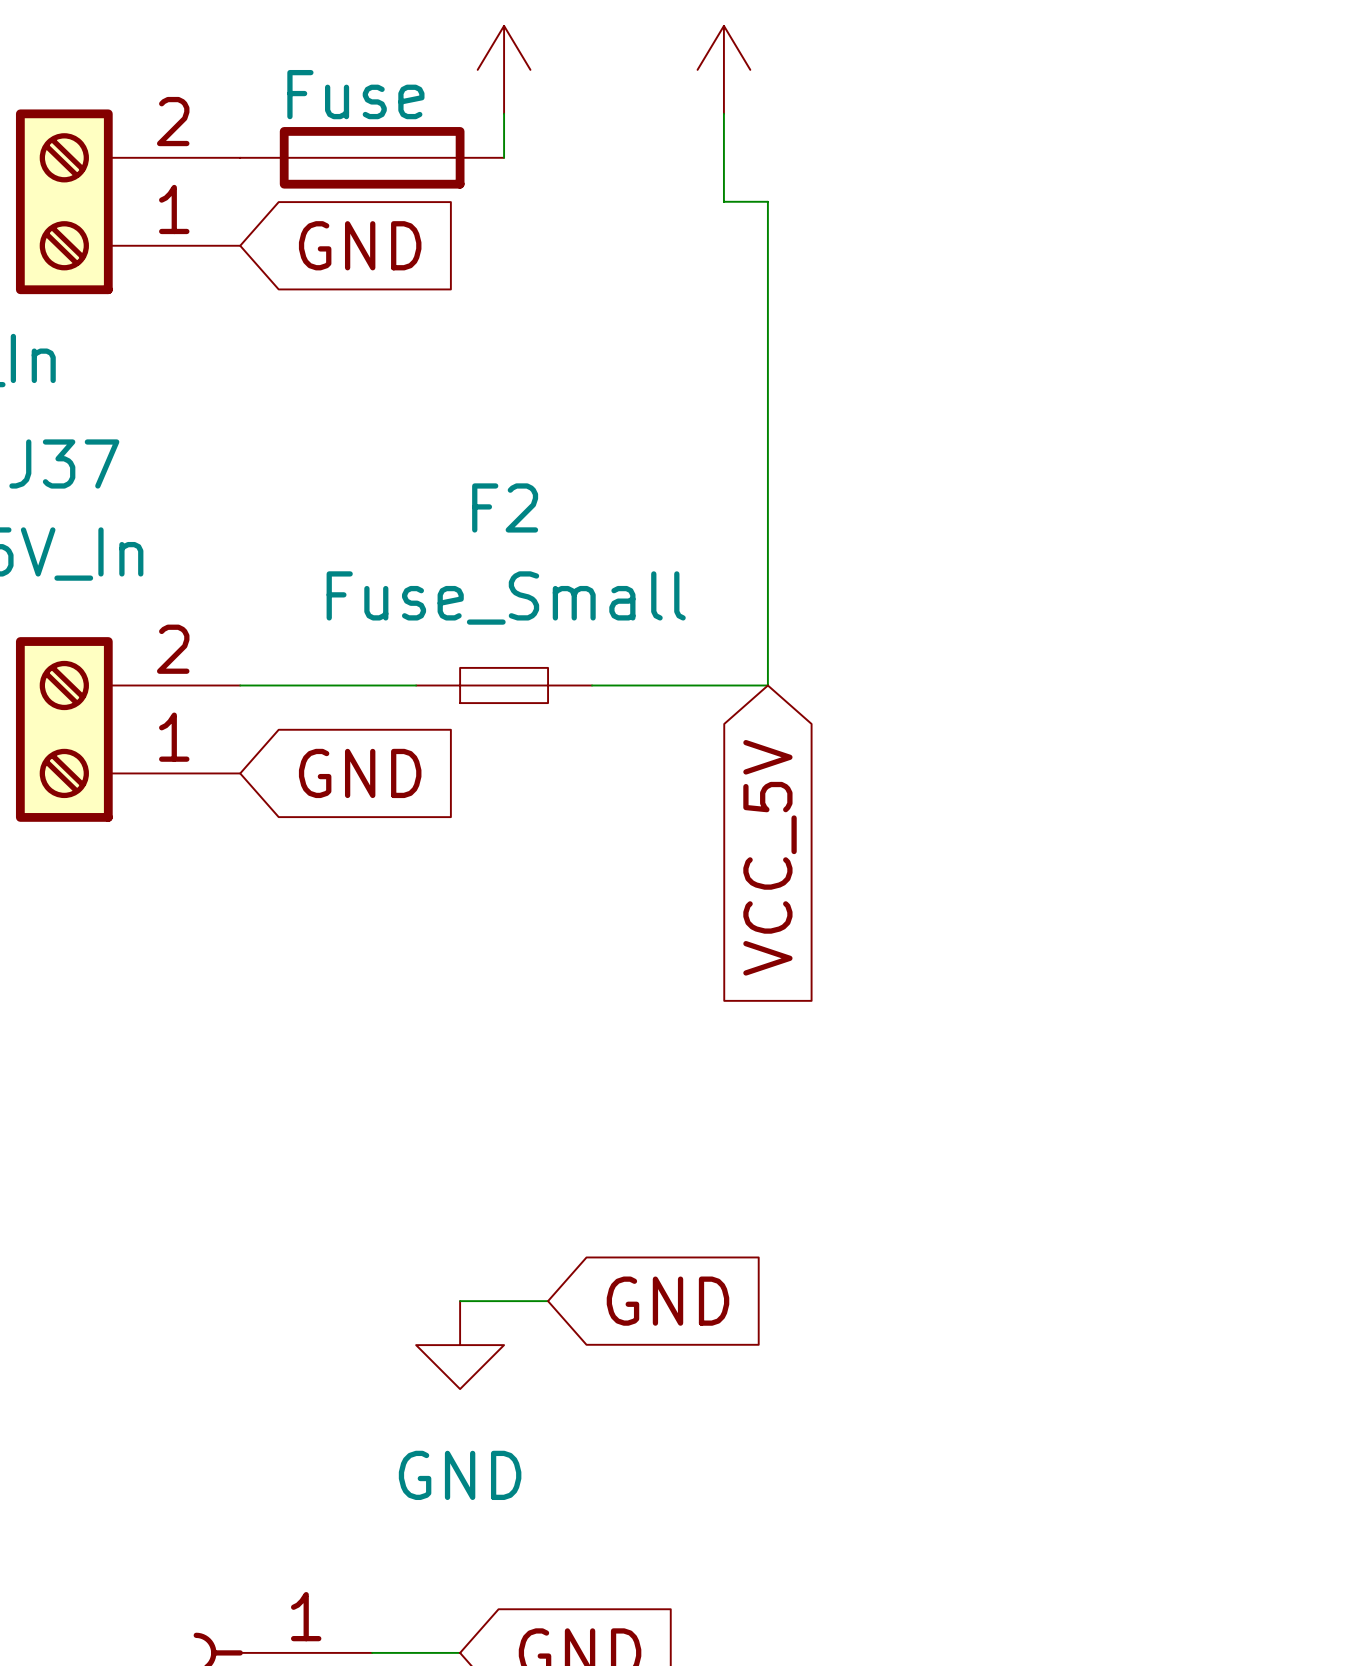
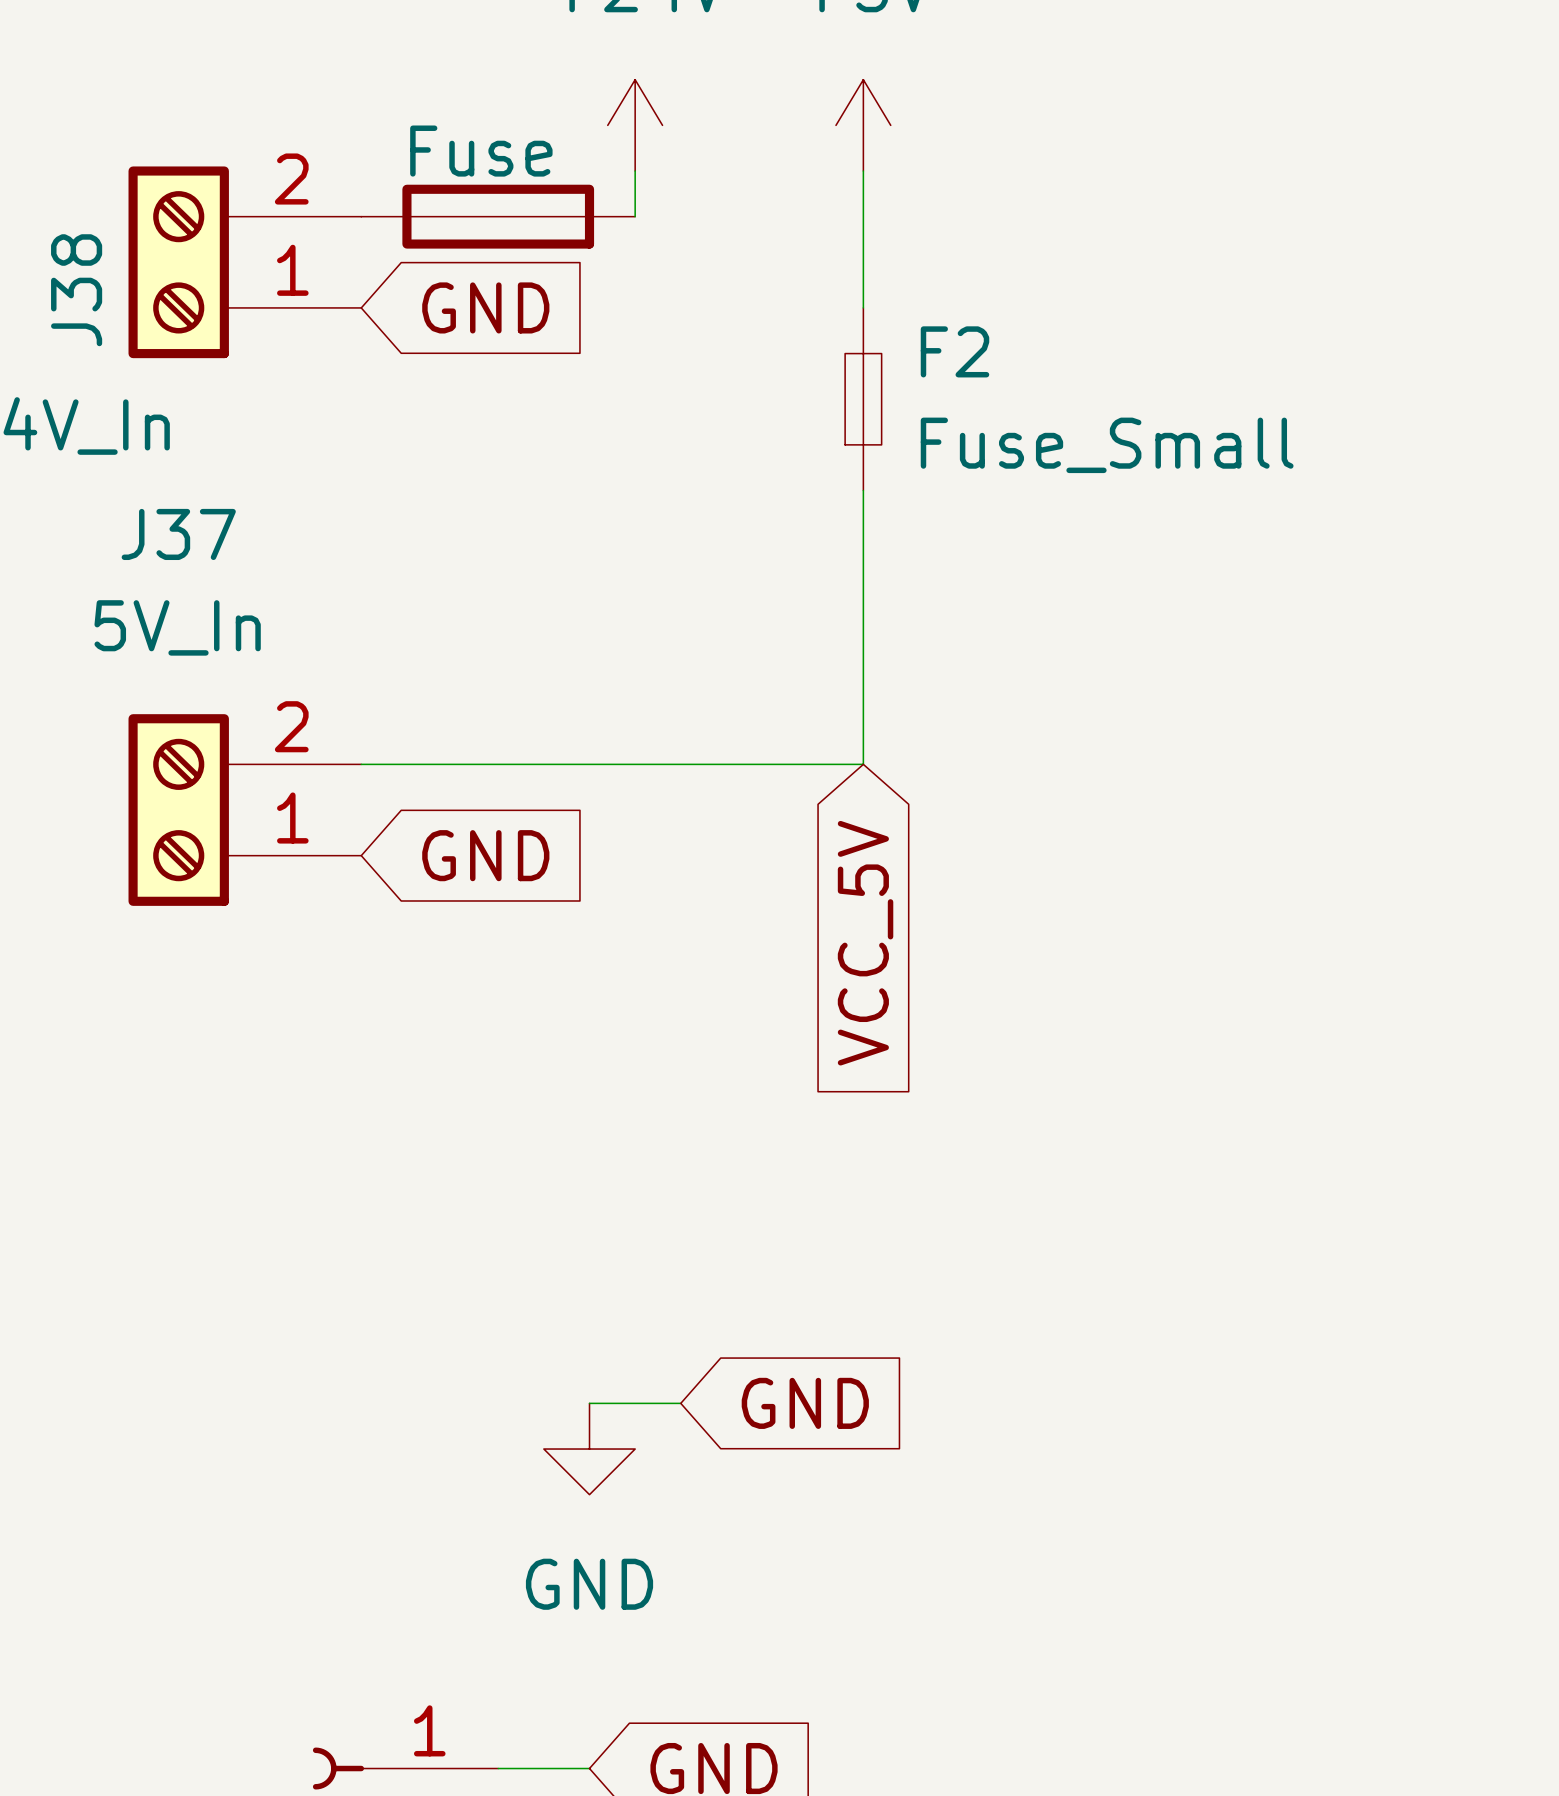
wire: (723, 201) (767, 201) (767, 685) (723, 685) -> (863, 490) (863, 764)
wire: none -> (863, 262) (863, 307)
F2 name position: F2 (505, 507) -> F2 (955, 351)
F2 value position: Fuse_Small (506, 598) -> Fuse_Small (1107, 445)
F2 rotation: 0° (504, 685) -> 90° clockwise (863, 399)
F2 position: (504, 685) -> (863, 399)
global label position: VCC_5V (770, 857) -> VCC_5V (865, 943)

